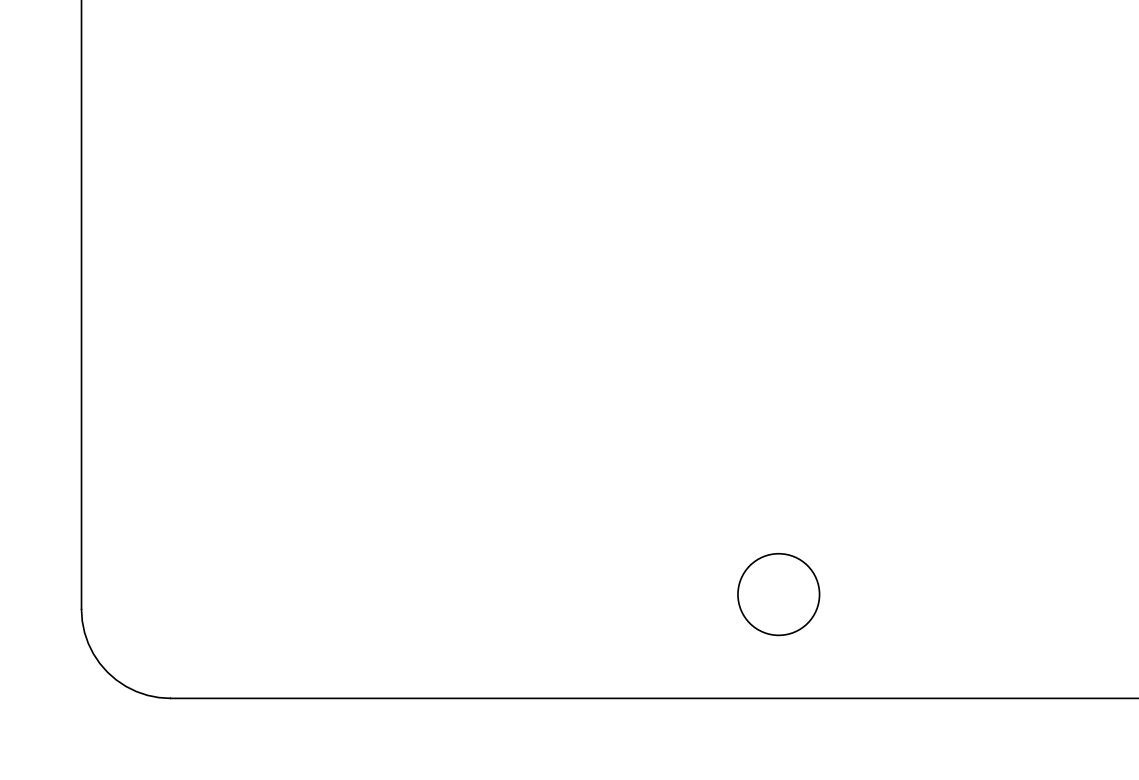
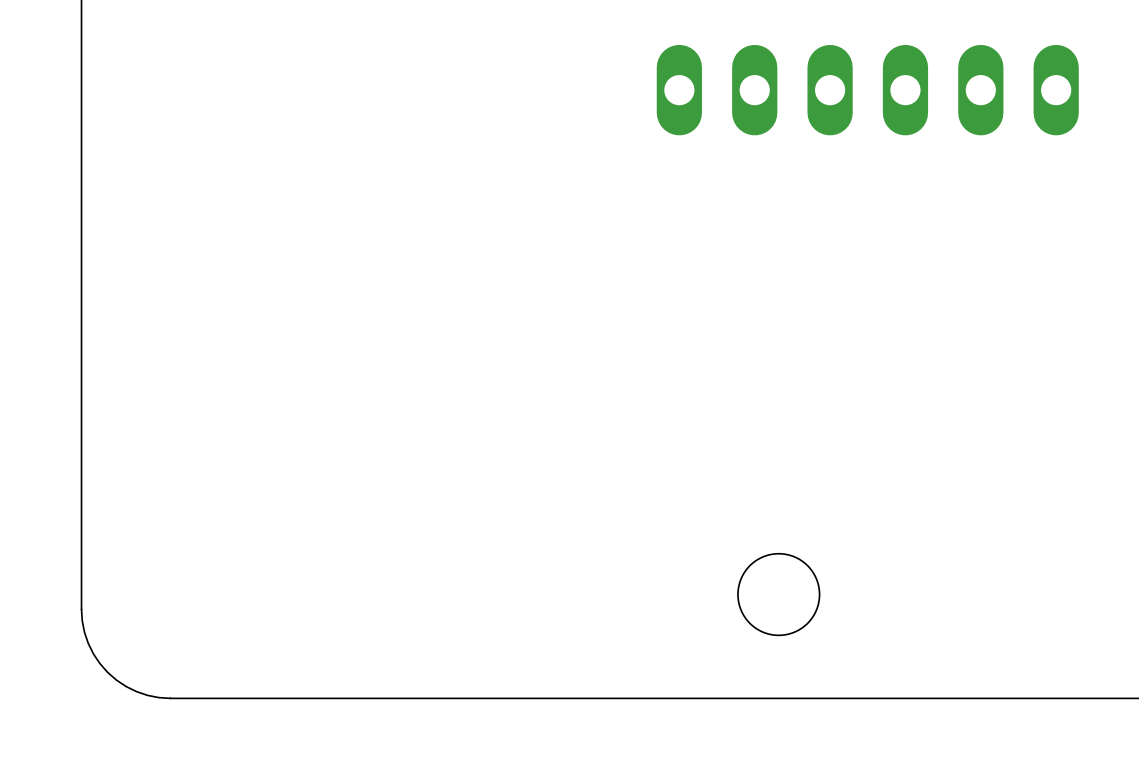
part: none -> (867, 90)

